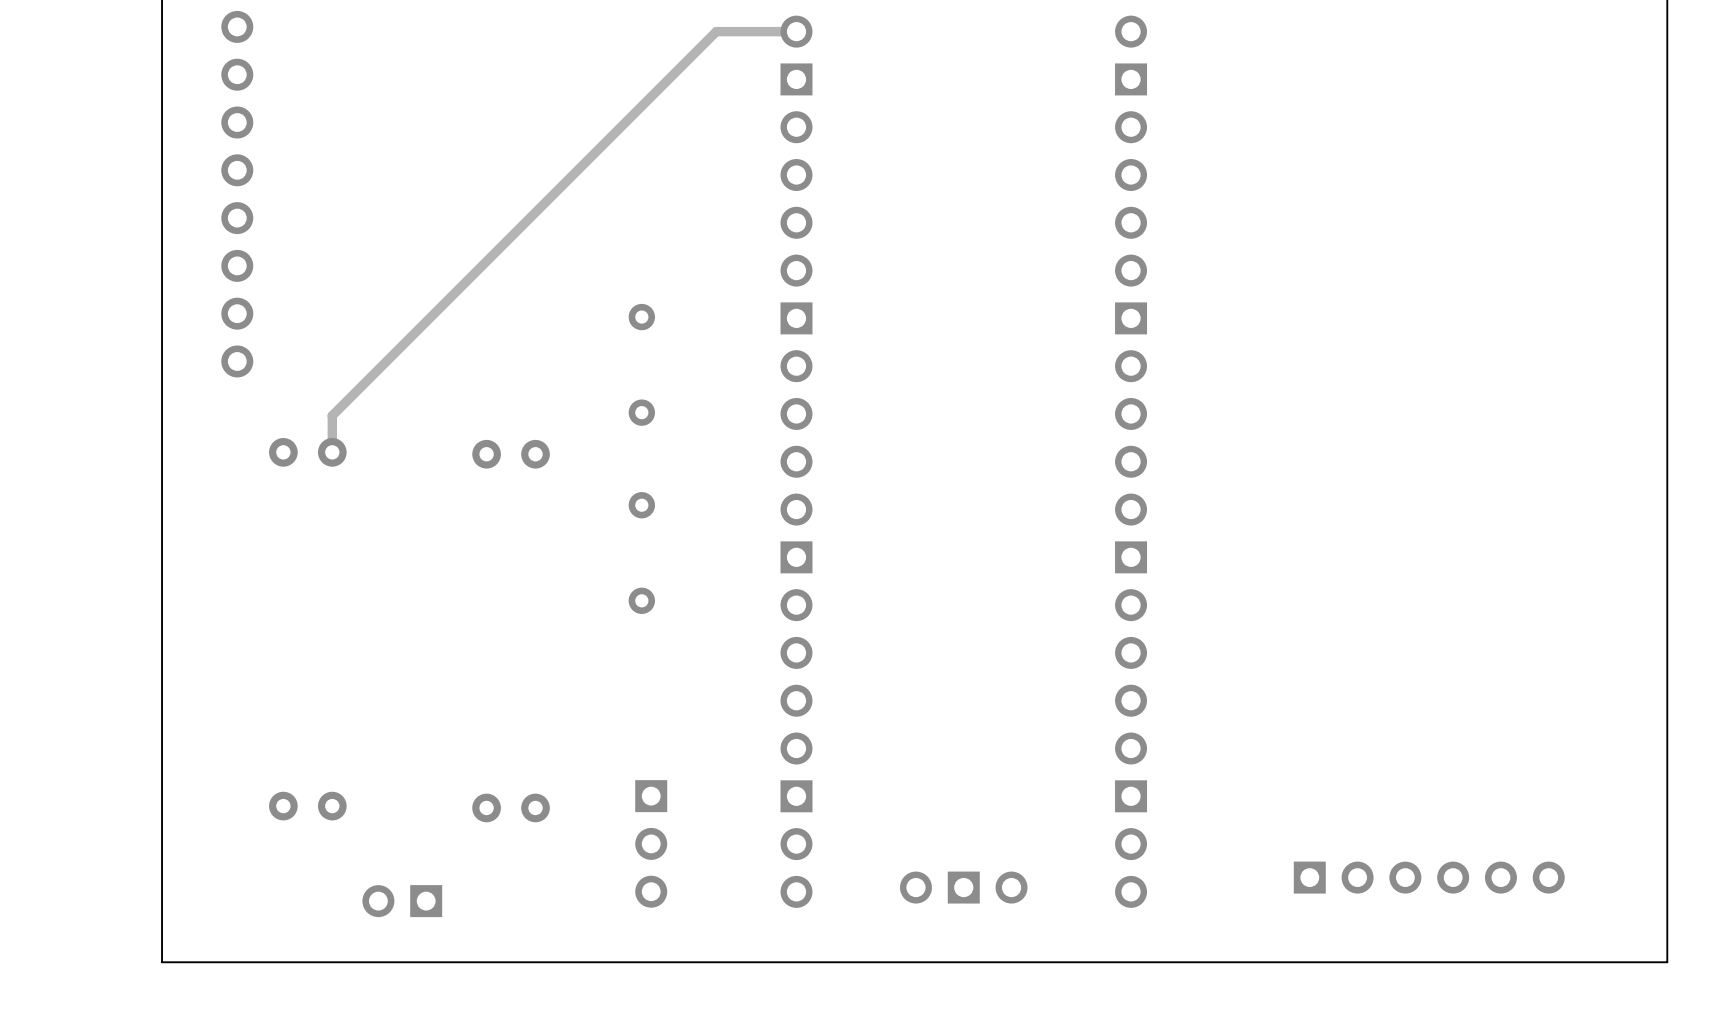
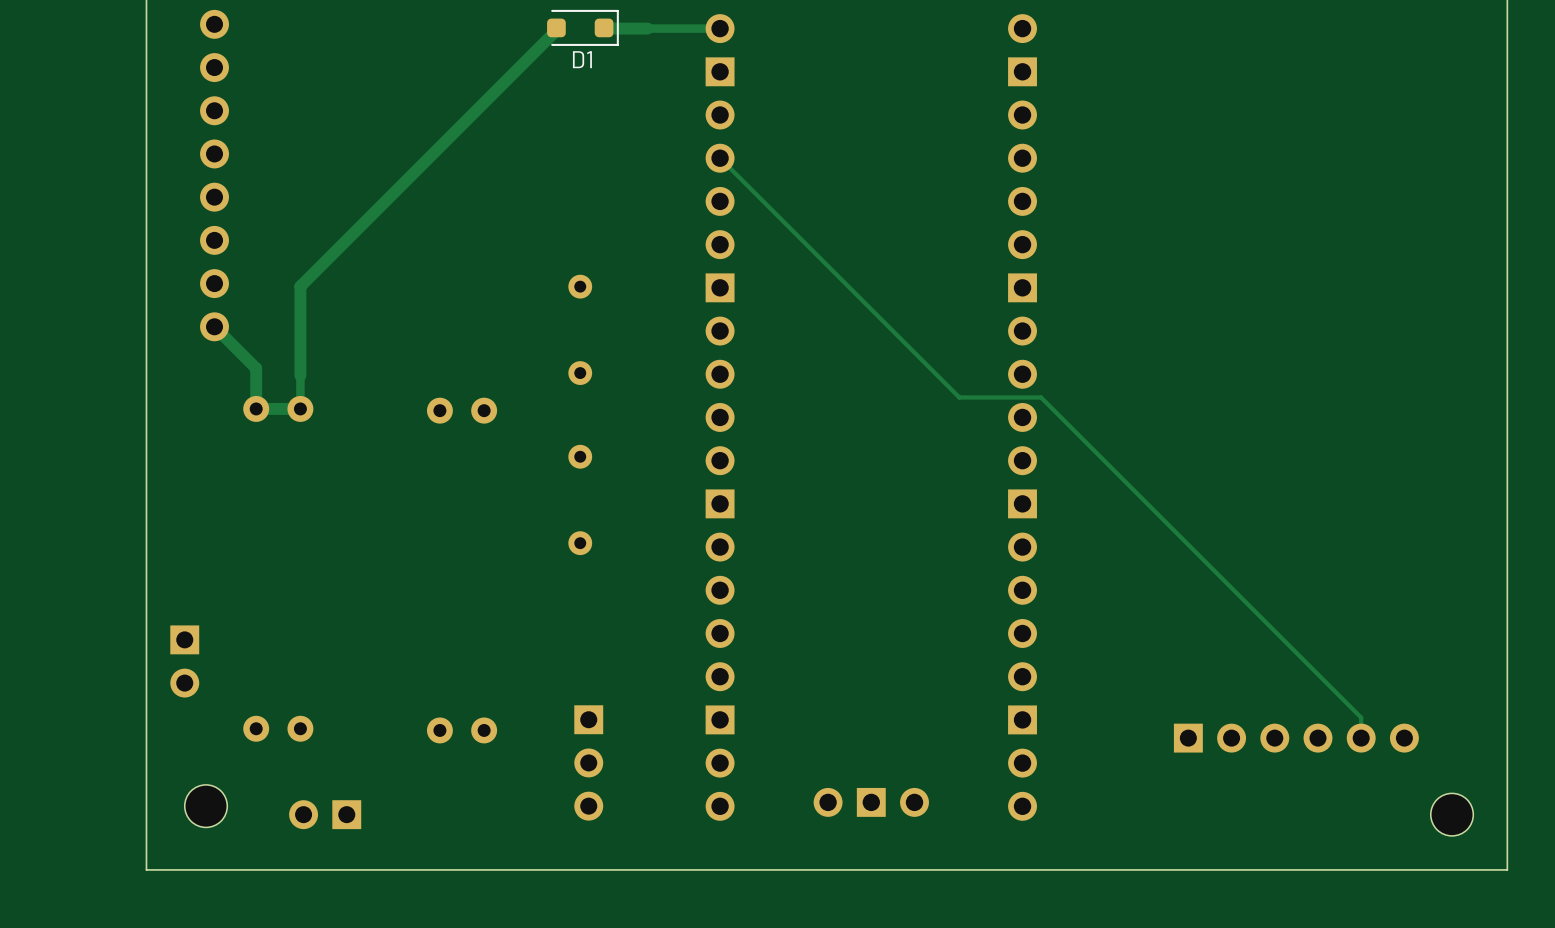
D1: none -> (582, 27)
track: none -> (604, 27) (647, 28)
track: (716, 31) (332, 415) -> (556, 32) (300, 286) (300, 375)
track: none -> (720, 158) (959, 397) (1041, 397) (1361, 717) (1361, 738)
track: none -> (214, 326) (256, 368) (256, 408) (300, 408)
part: none -> (184, 661)
part position: (1429, 877) -> (1296, 738)
part: none -> (206, 806)
part position: (402, 901) -> (325, 814)
part: none -> (1452, 814)

